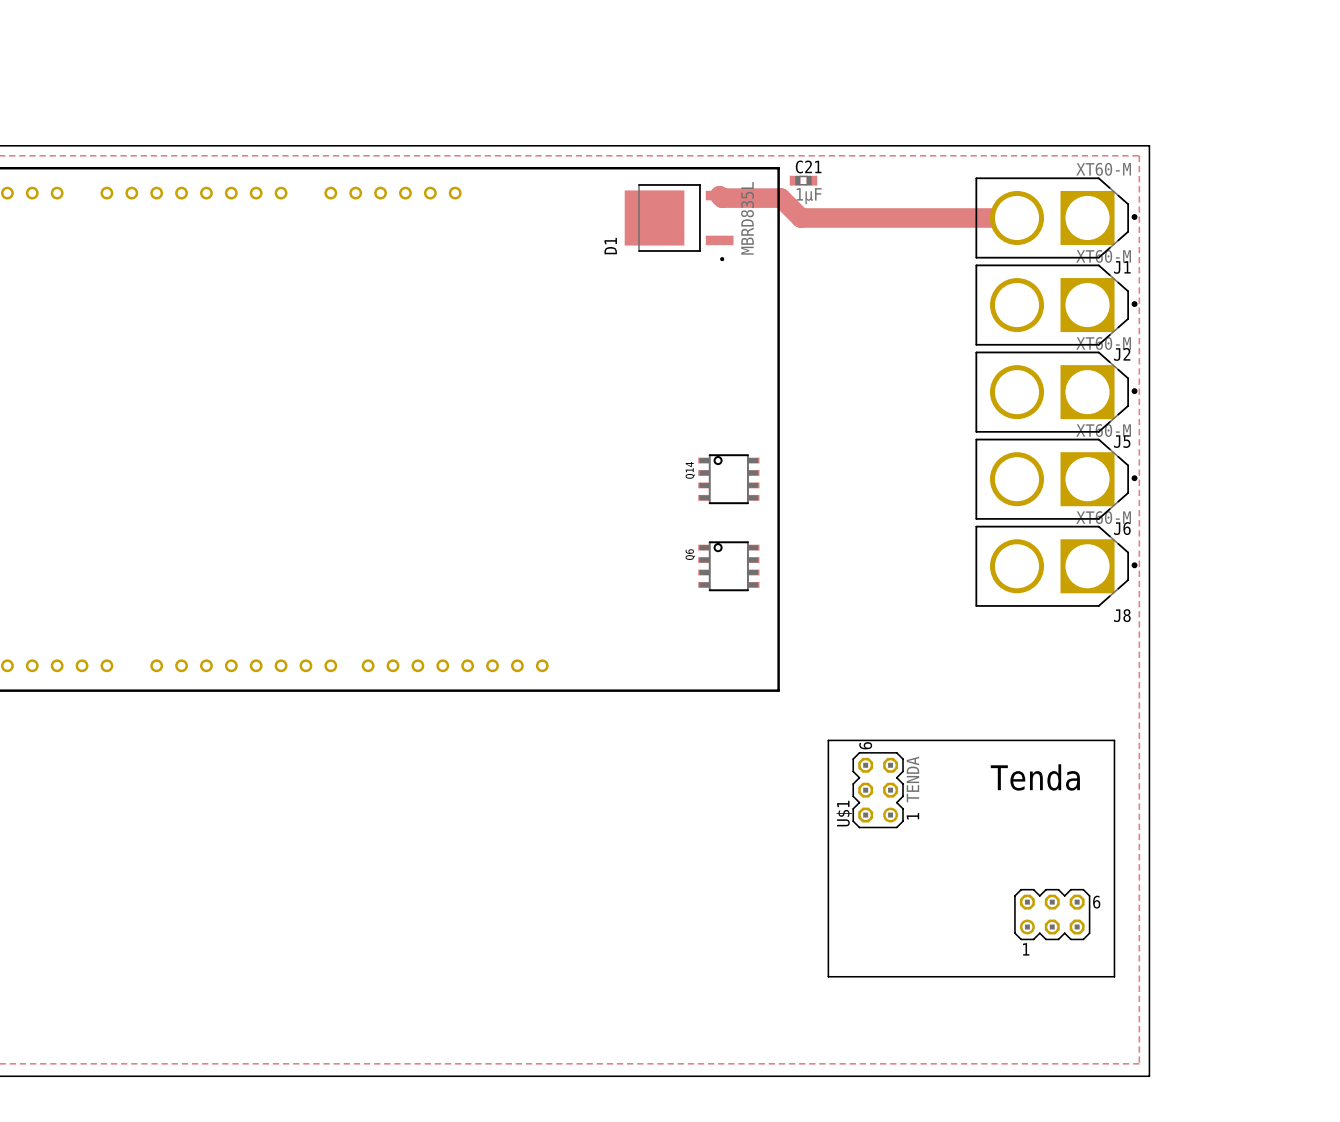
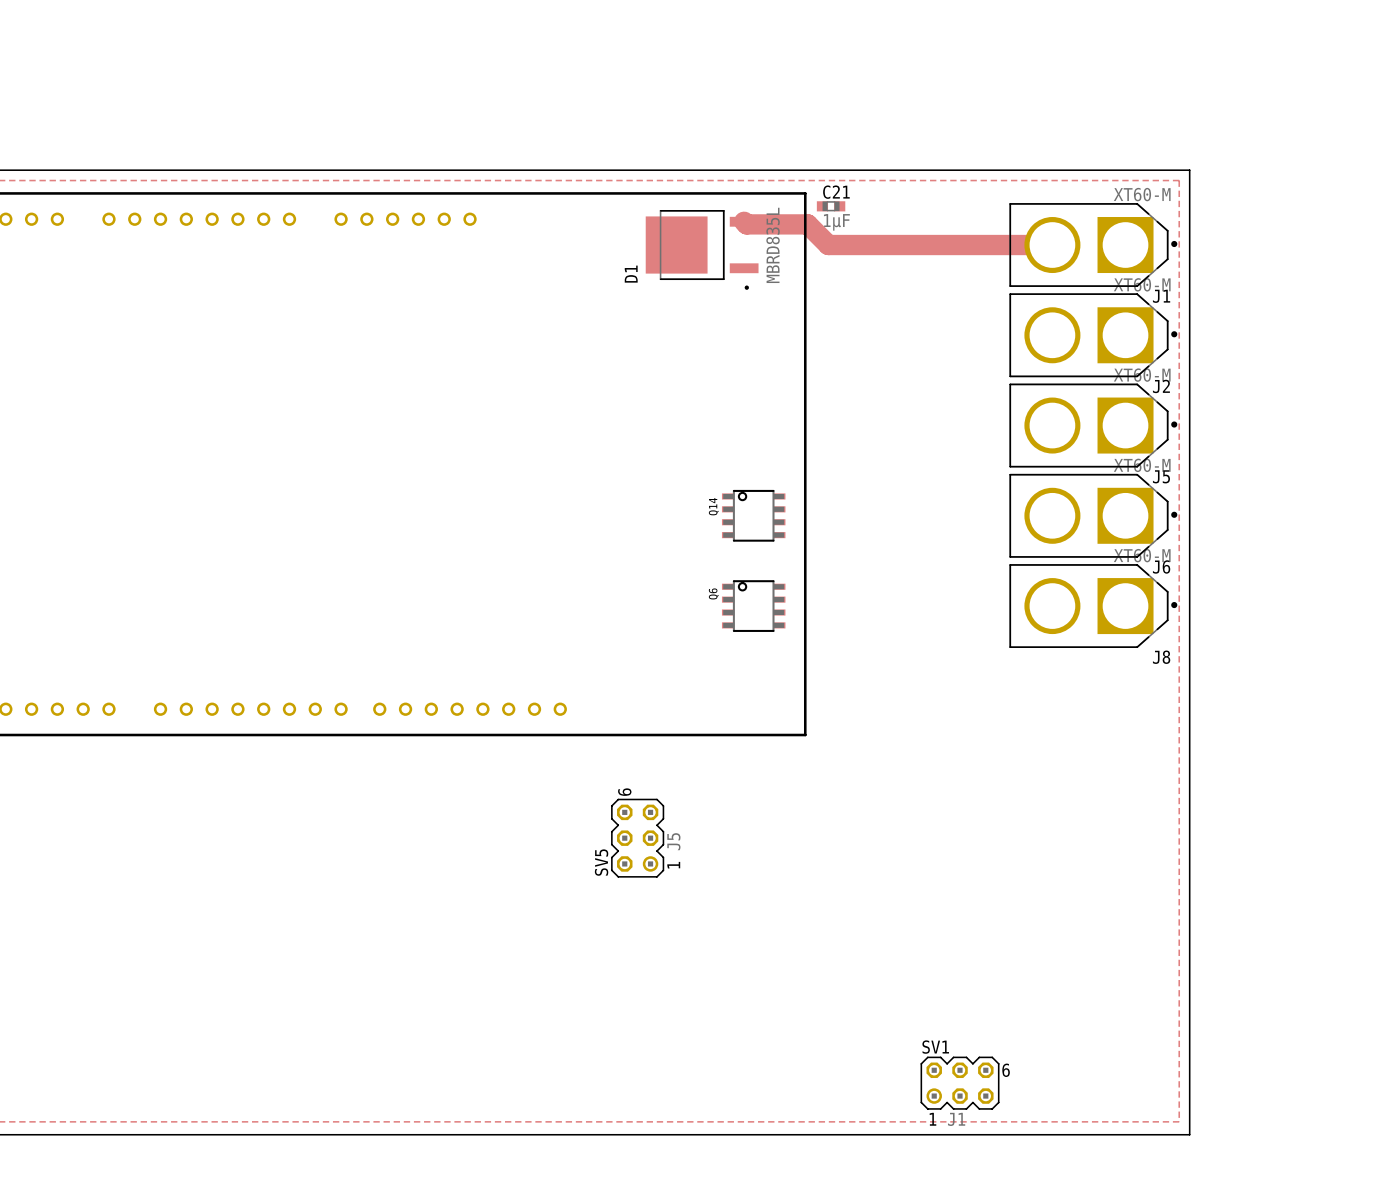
SV5: none -> J5 (637, 838)
U$1: TENDA (971, 858) -> none
SV1: none -> J1 (960, 1083)

